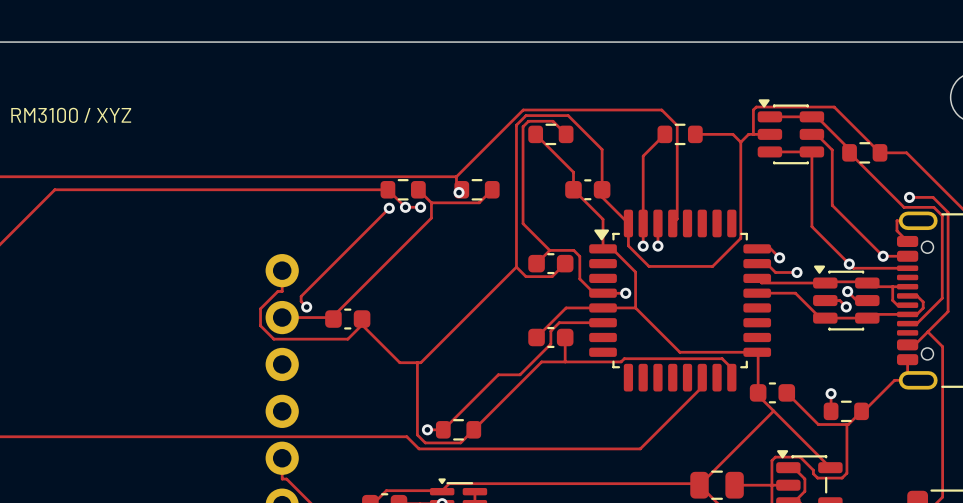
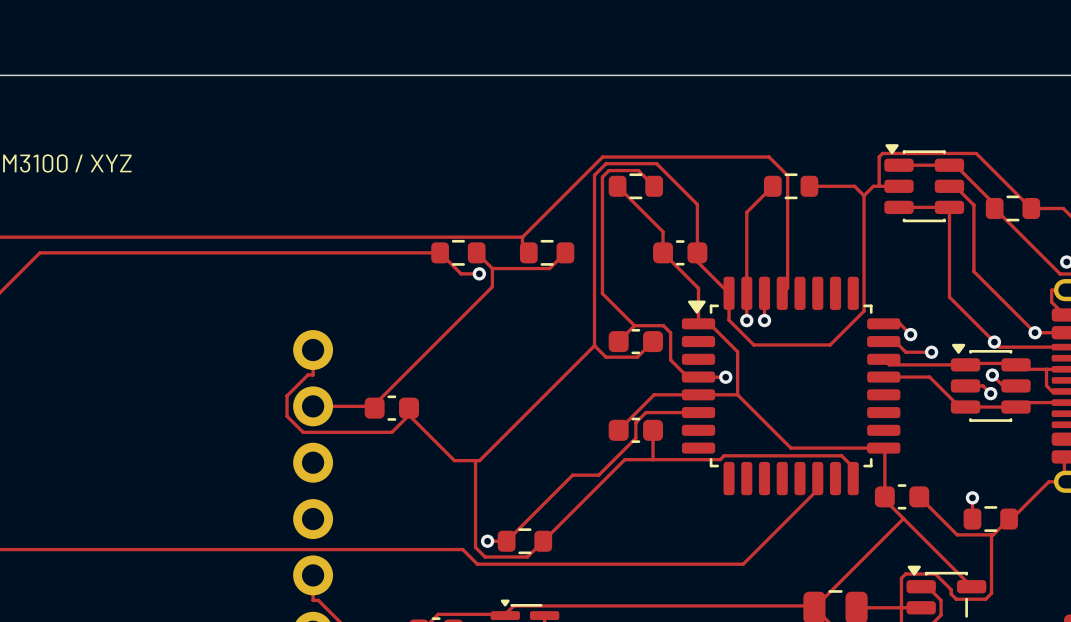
via: (459, 192) -> none
via: (405, 207) -> none
track: (389, 208) (301, 296) (301, 301) (306, 307) -> none
via: (389, 208) -> none
via: (306, 307) -> none

